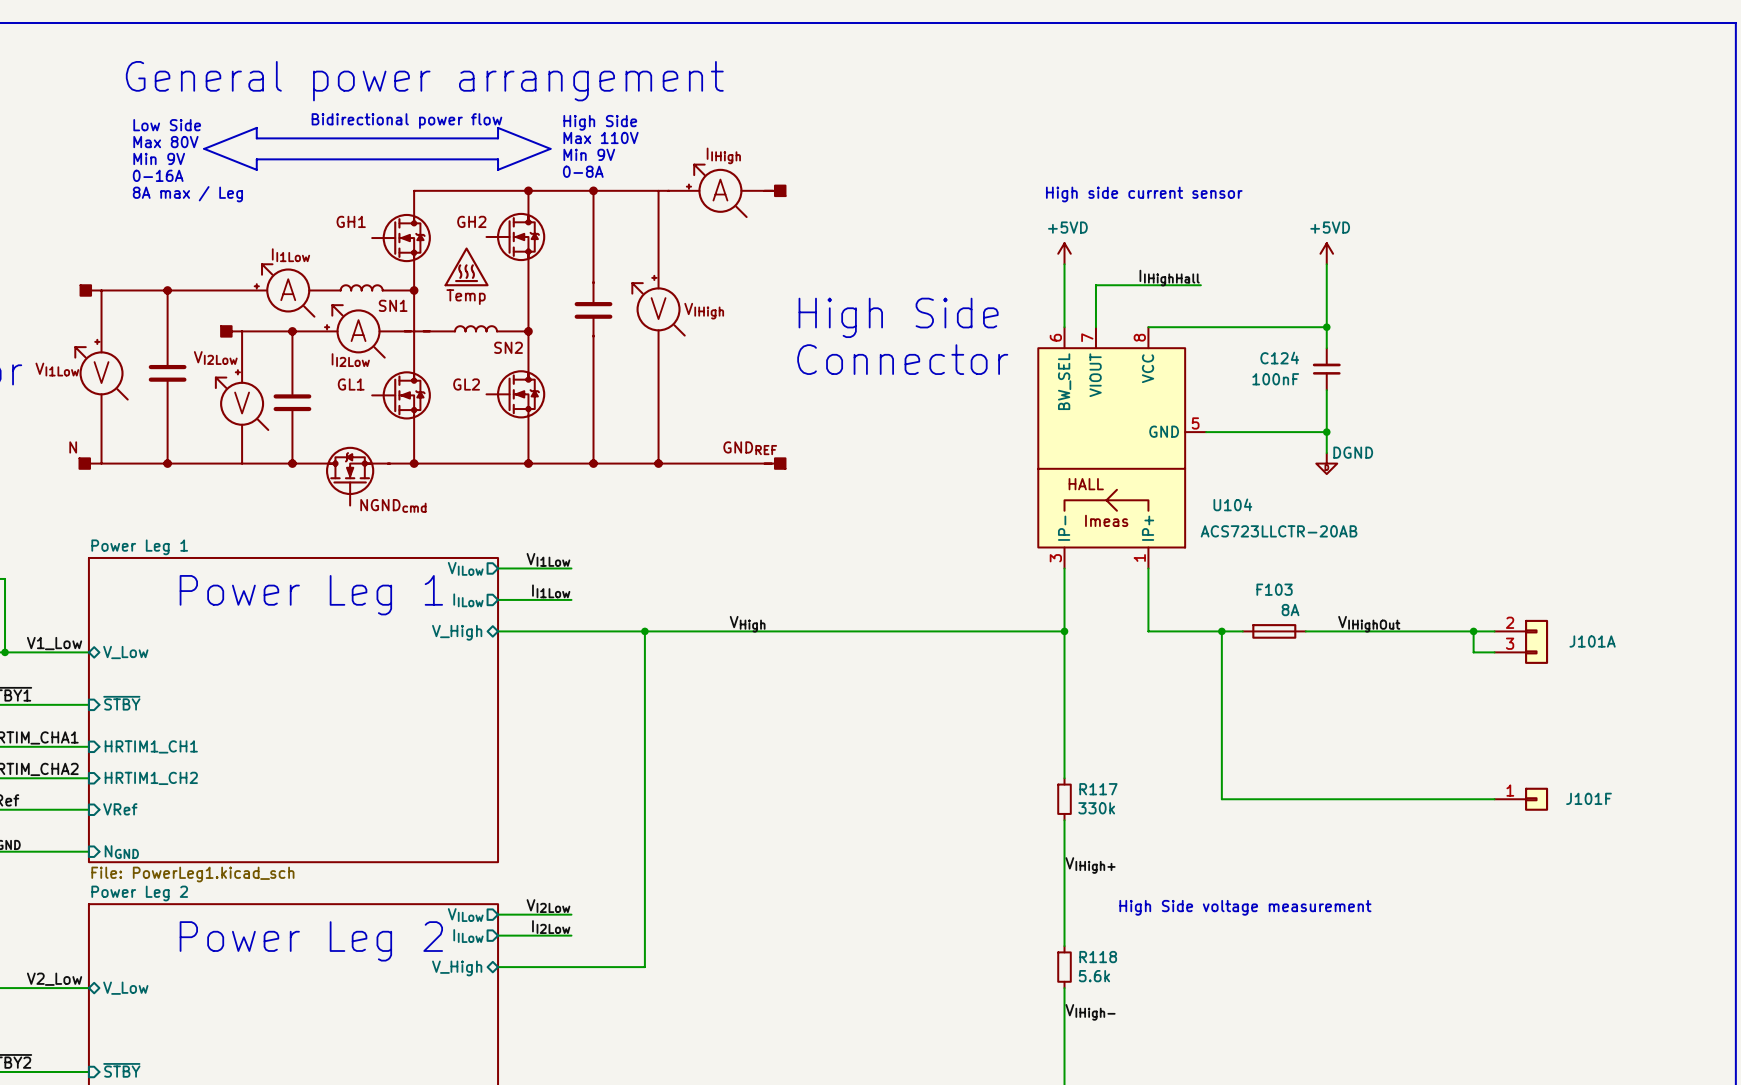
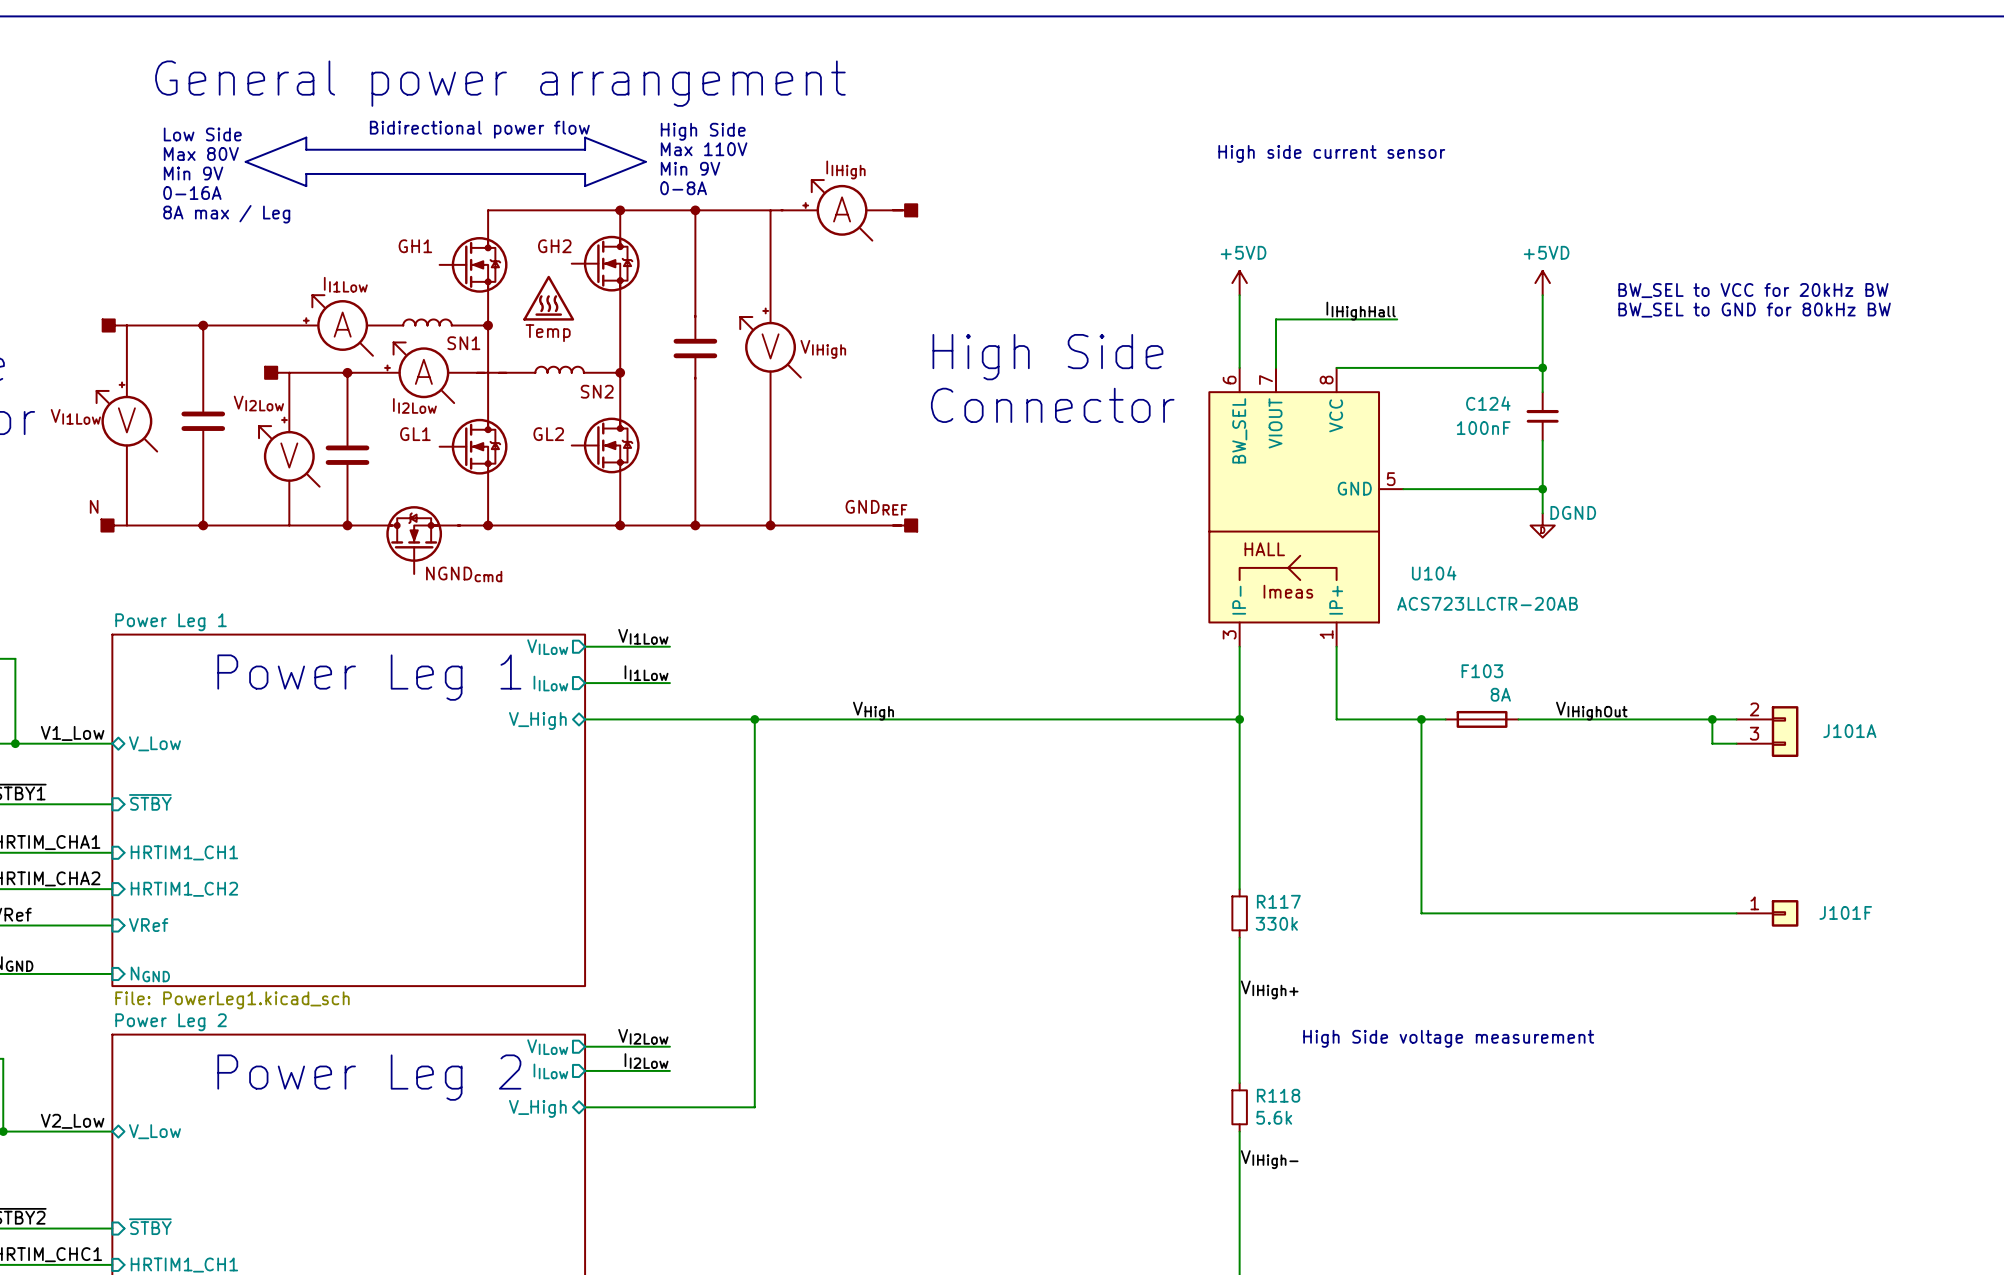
text position: High side current sensor (1144, 194) -> High side current sensor (1331, 153)
text: none -> BW_SEL to VCC for 20kHz BW (1753, 290)
text: none -> BW_SEL to GND for 80kHz BW (1754, 310)

